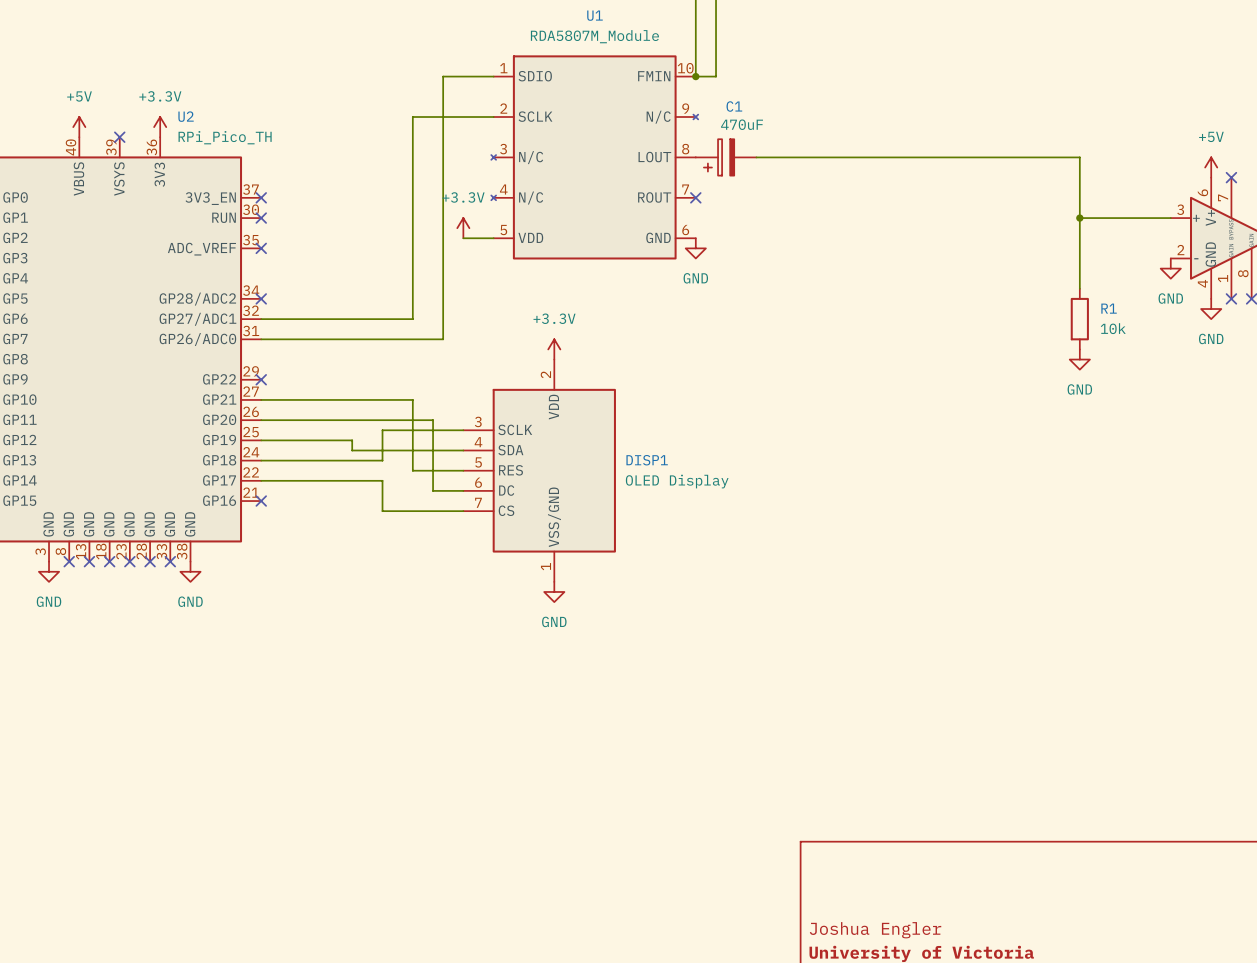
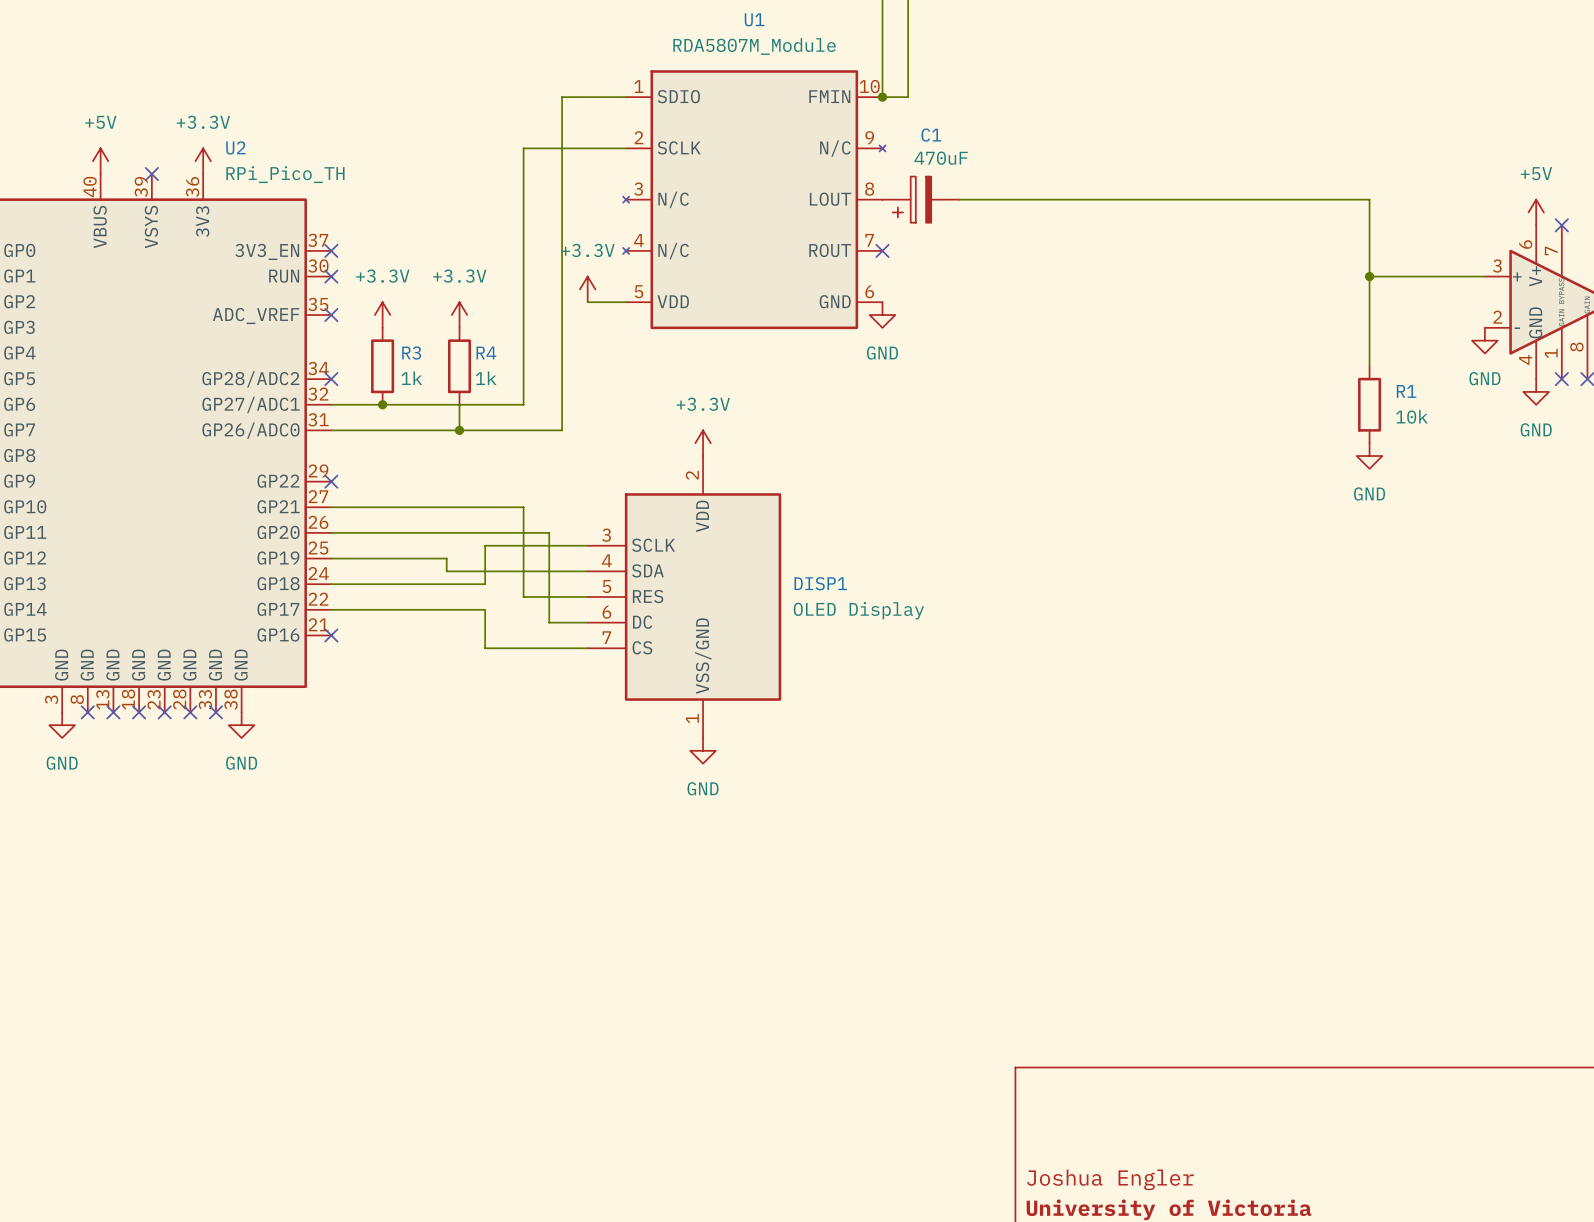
power symbol: none -> +3.3V (382, 315)
power symbol: none -> +3.3V (459, 315)
R3: none -> 1k (382, 366)
R4: none -> 1k (459, 366)
junction: none -> (382, 404)
wire: none -> (459, 404) (459, 430)
junction: none -> (459, 430)

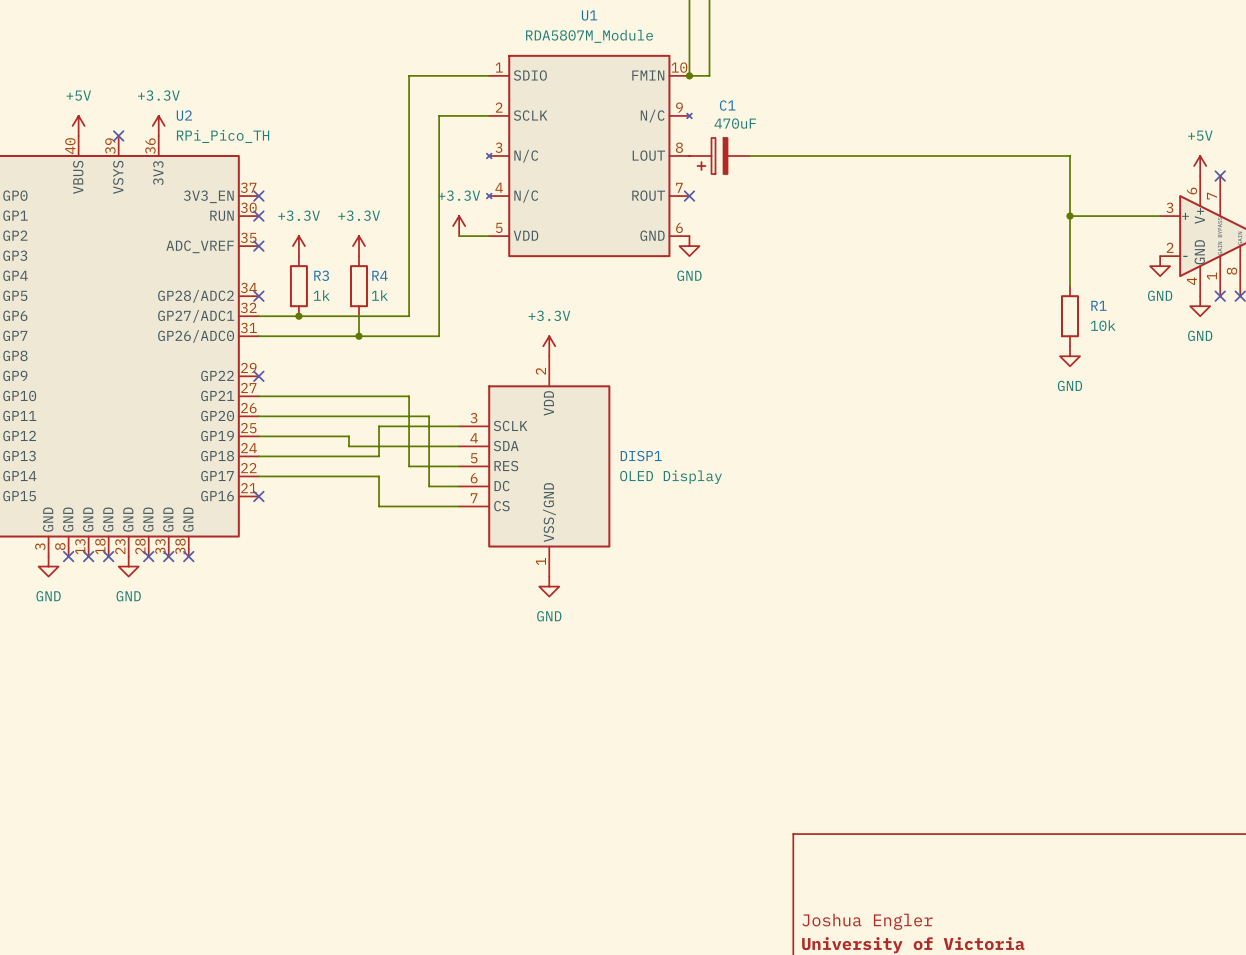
wire: (562, 97) (562, 148) (523, 148) -> (439, 75) (409, 75) (409, 115)
no-connect mark: (164, 712) -> none
no-connect mark: none -> (188, 556)
power symbol position: GND (241, 725) -> GND (128, 566)

